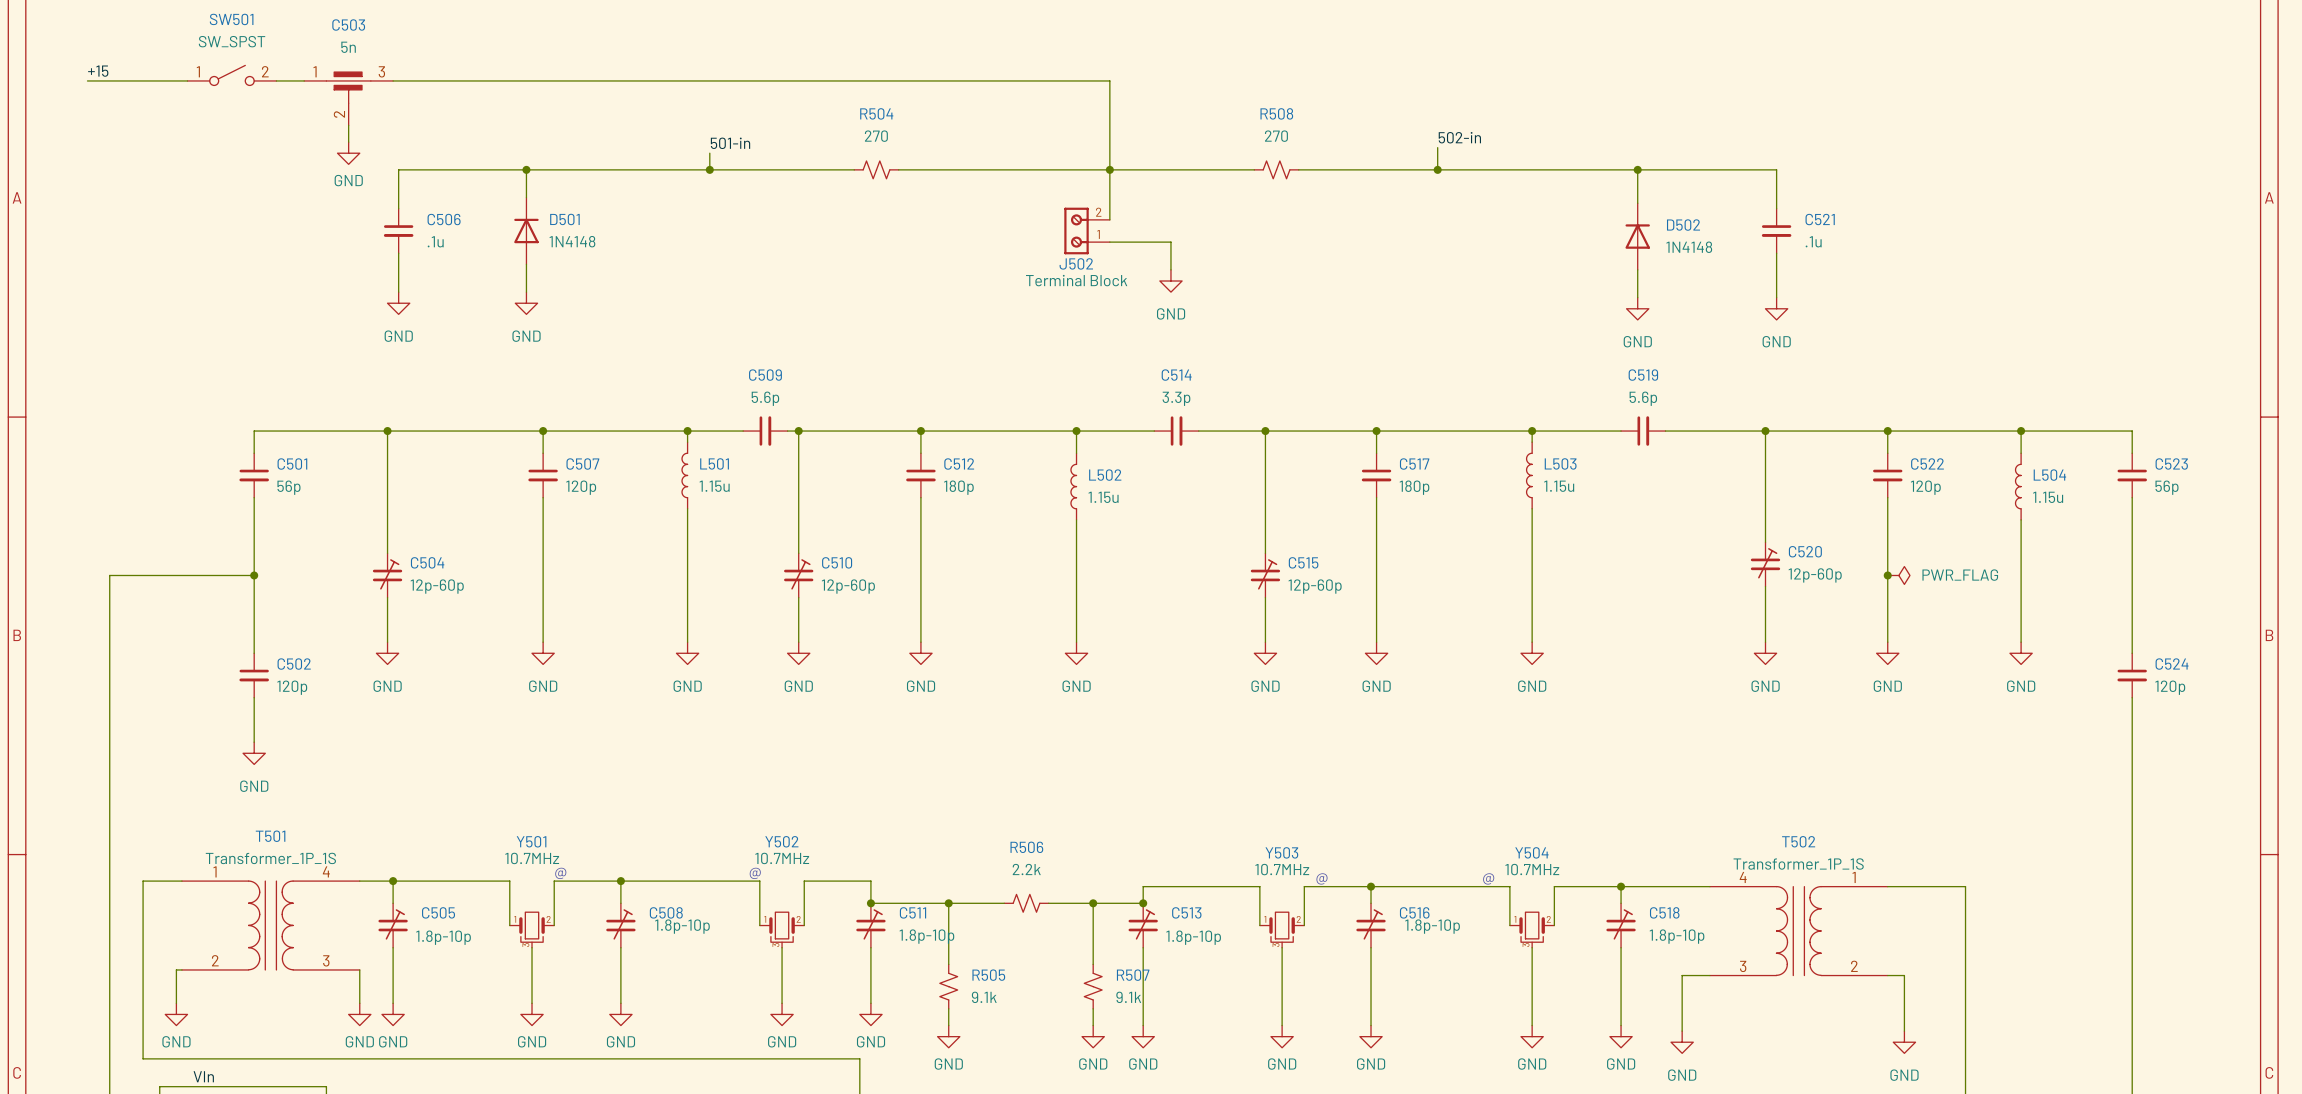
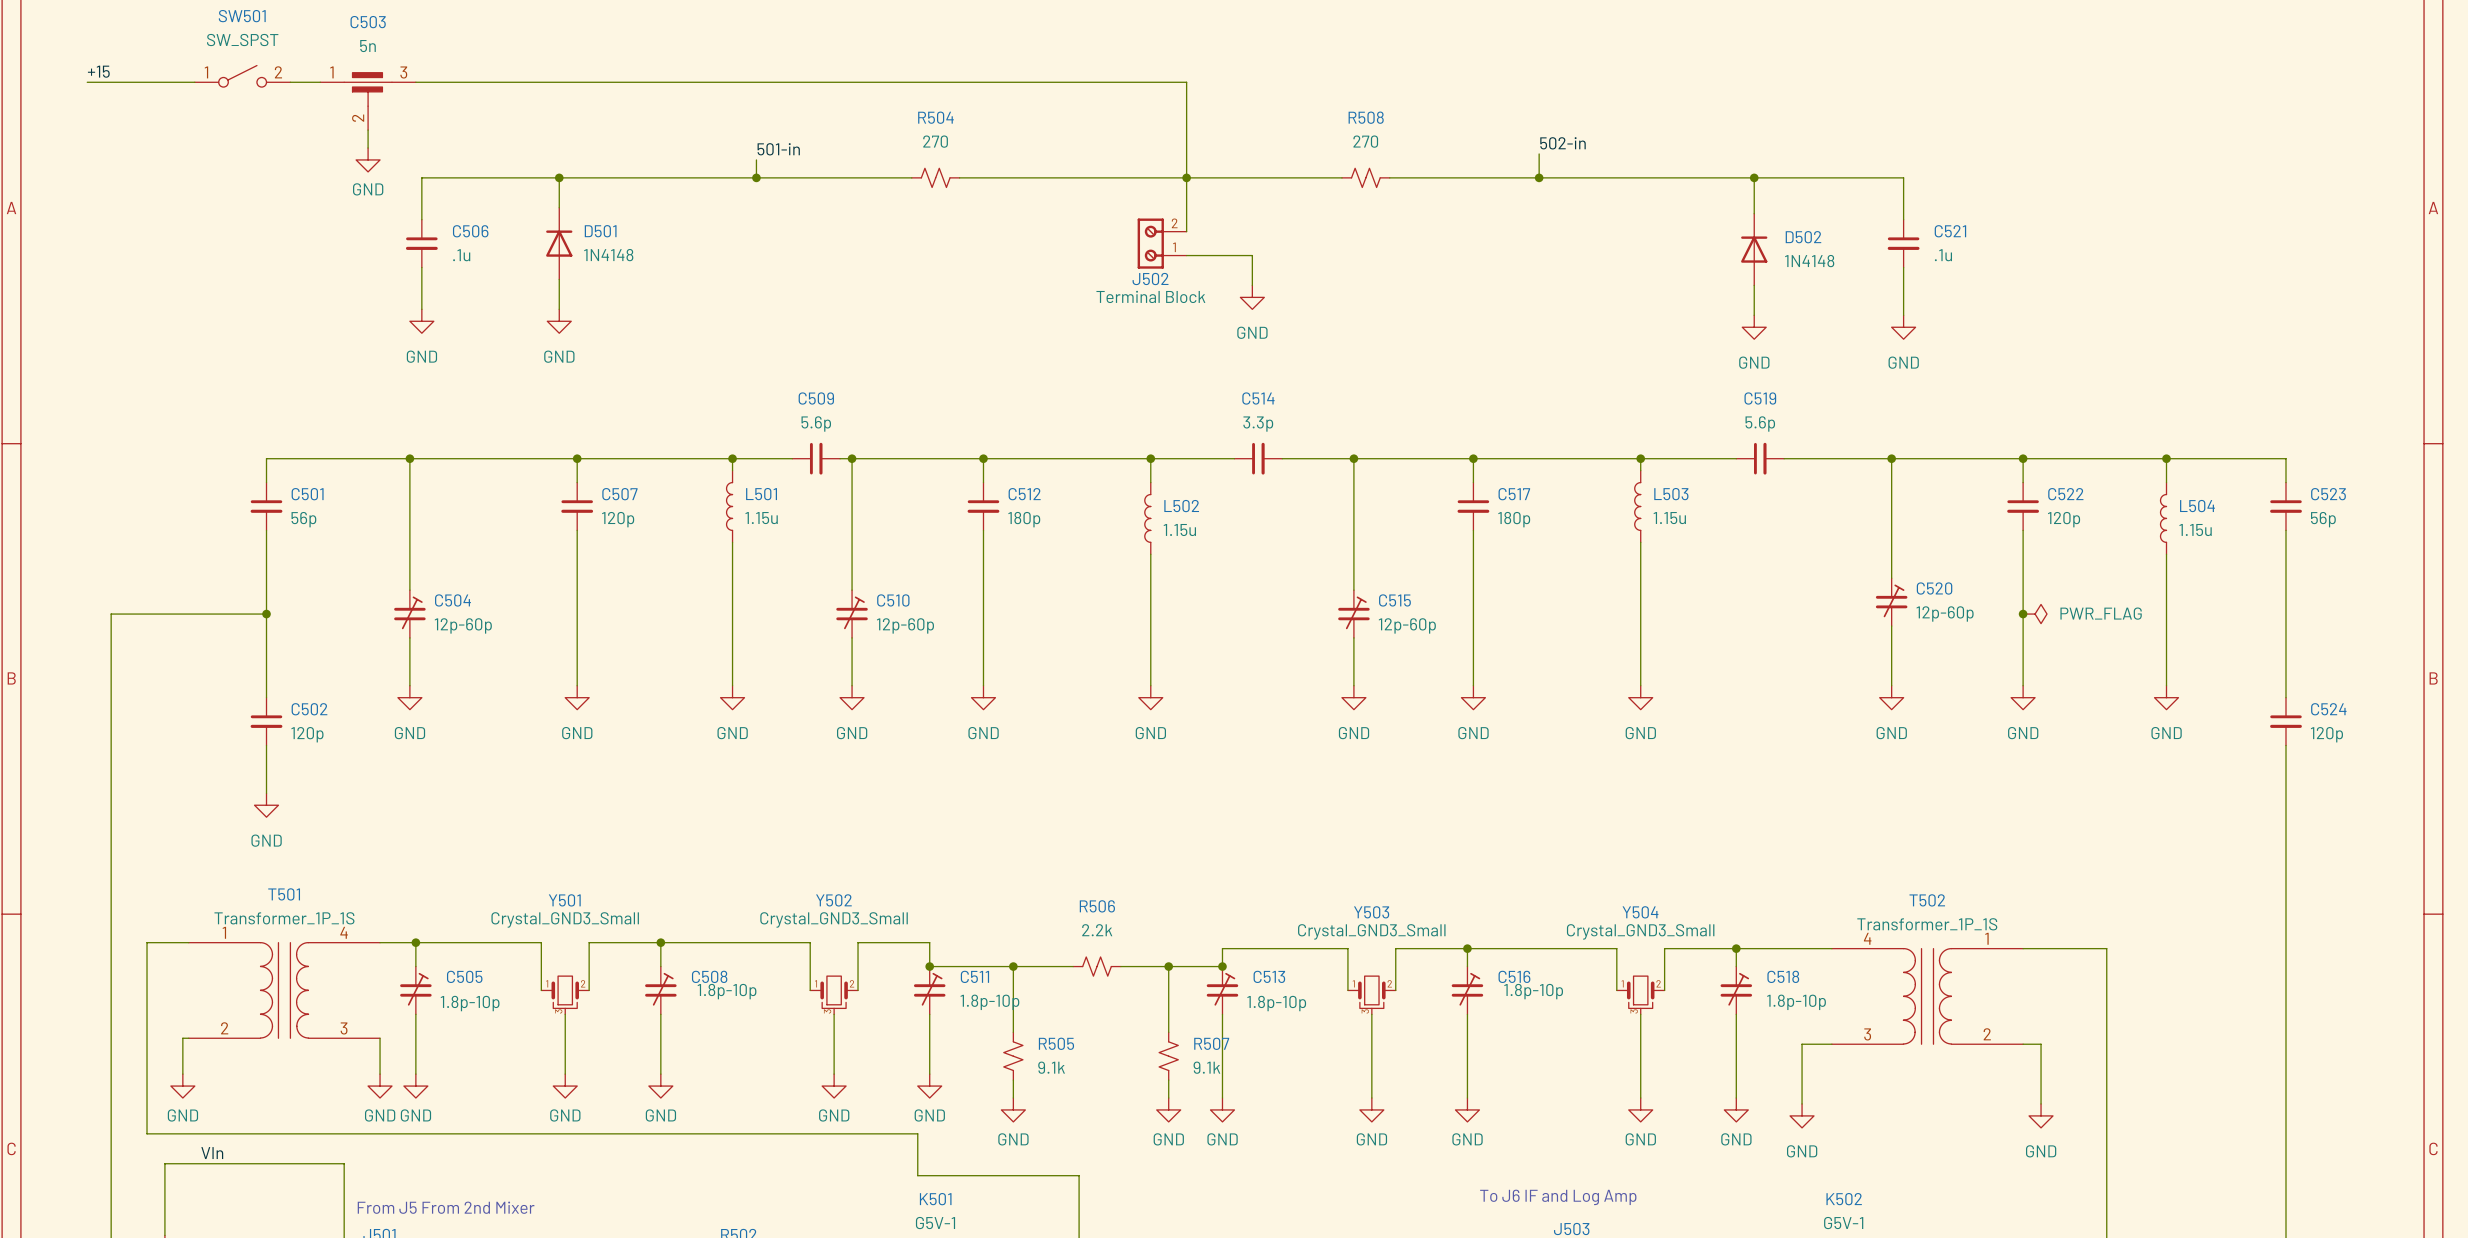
Y501 value: 10.7MHz (532, 858) -> Crystal_GND3_Small (565, 919)
Y502 value: 10.7MHz (782, 858) -> Crystal_GND3_Small (834, 919)
Y503 value: 10.7MHz (1282, 869) -> Crystal_GND3_Small (1371, 931)
Y504 value: 10.7MHz (1532, 869) -> Crystal_GND3_Small (1640, 931)
text: @ (560, 873) -> none
text: @ (755, 873) -> none
text: @ (1321, 878) -> none
text: @ (1488, 878) -> none

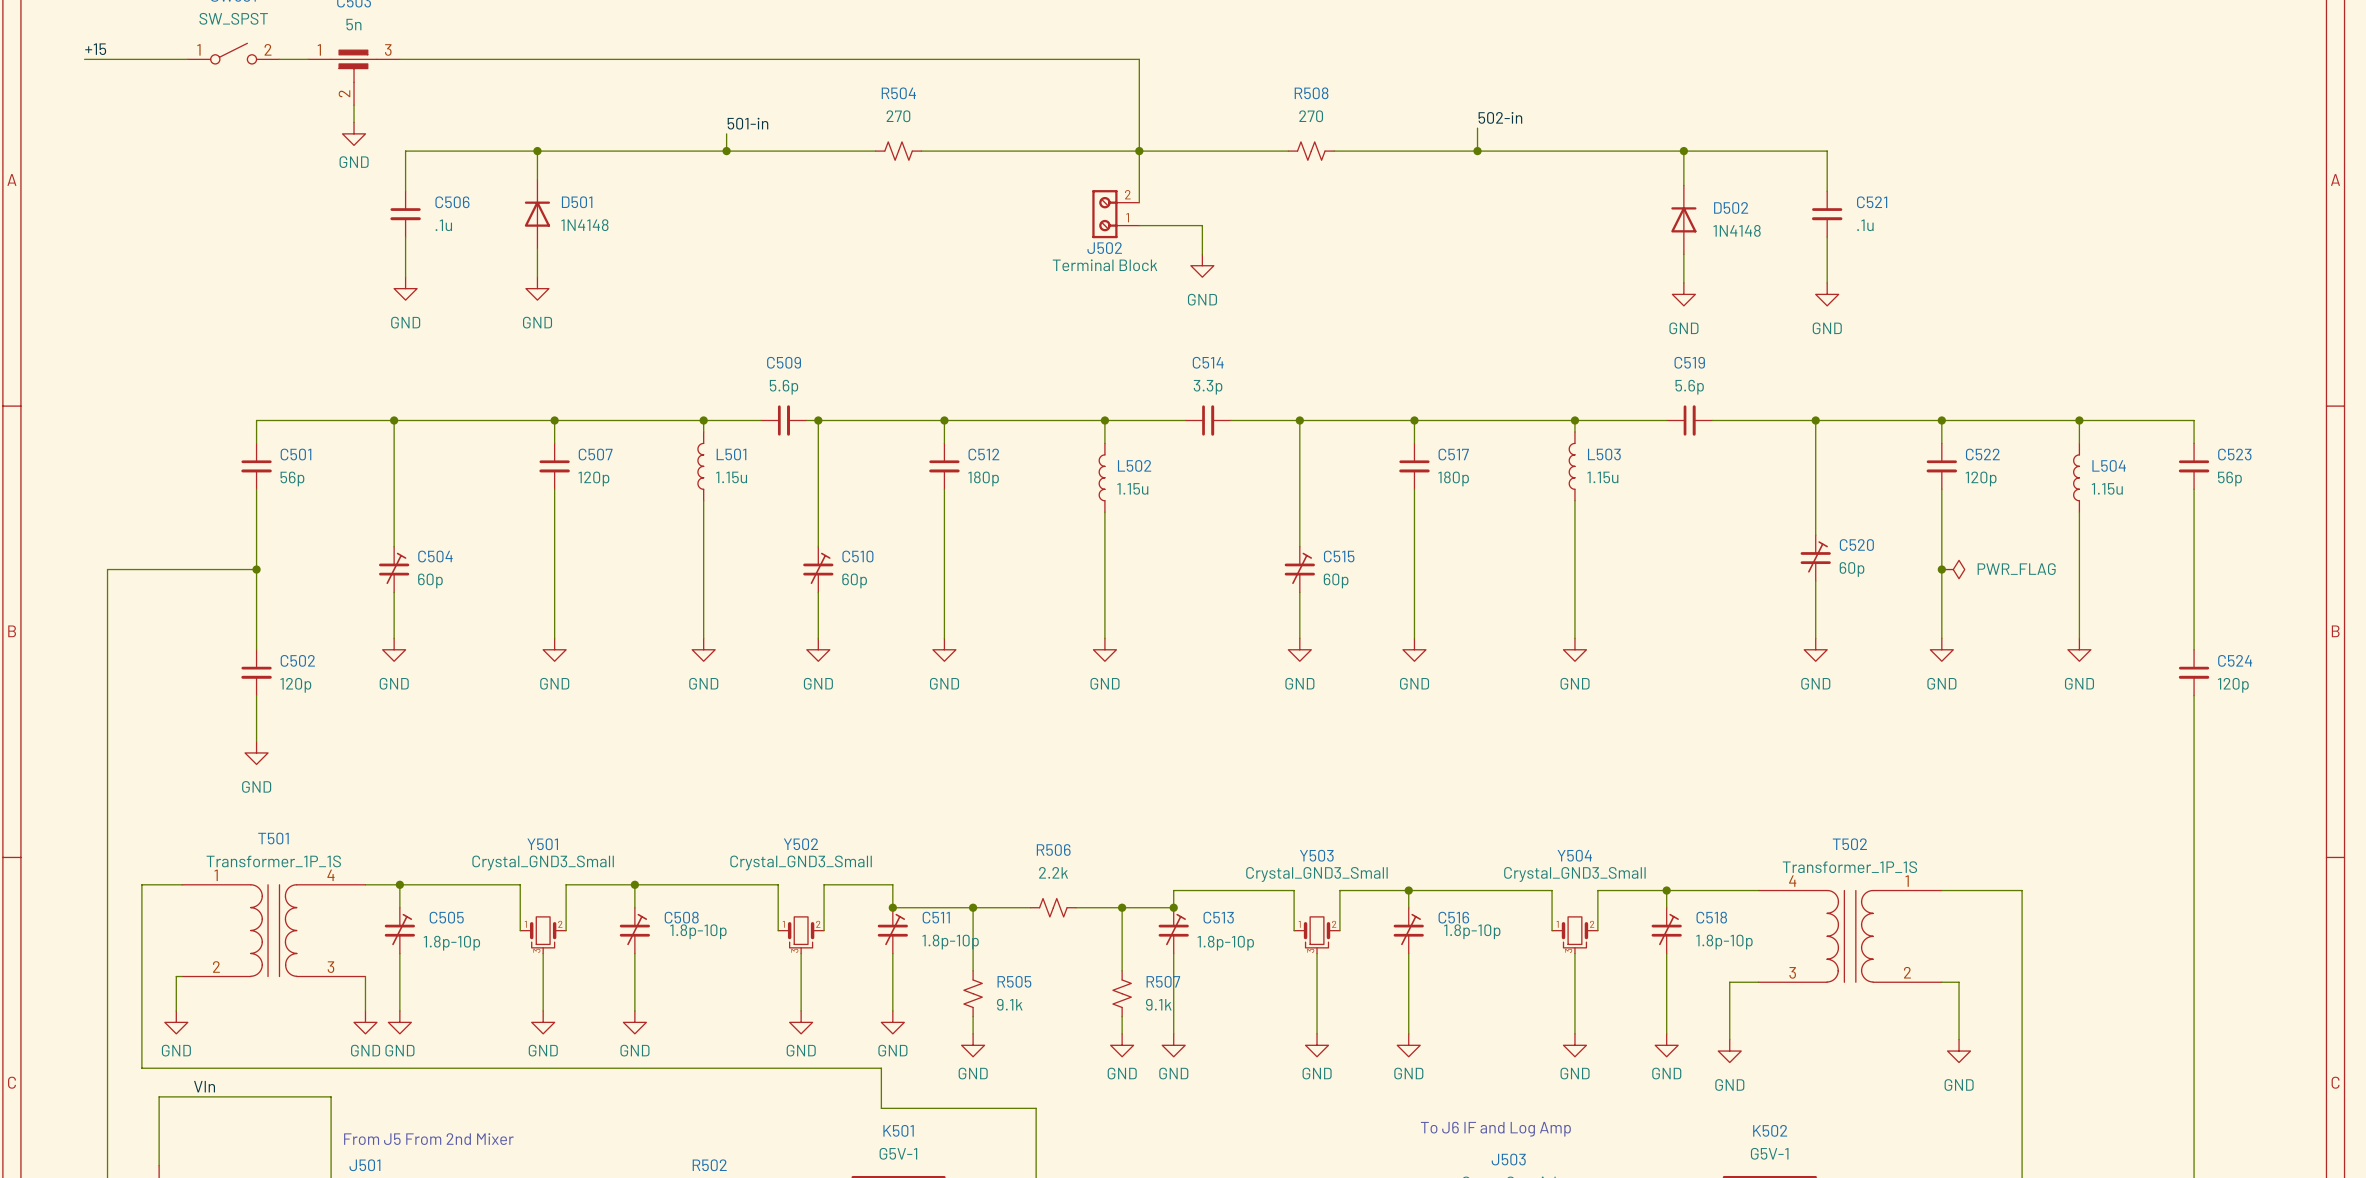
C520 value: 12p-60p (1945, 613) -> 60p (1852, 569)
C504 value: 12p-60p (463, 625) -> 60p (430, 580)
C510 value: 12p-60p (905, 625) -> 60p (854, 580)
C515 value: 12p-60p (1407, 625) -> 60p (1336, 580)

